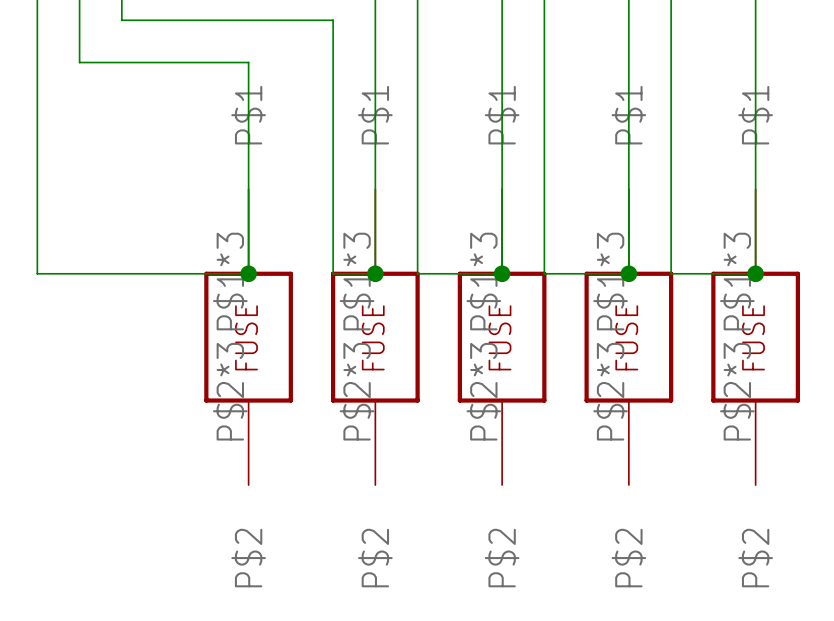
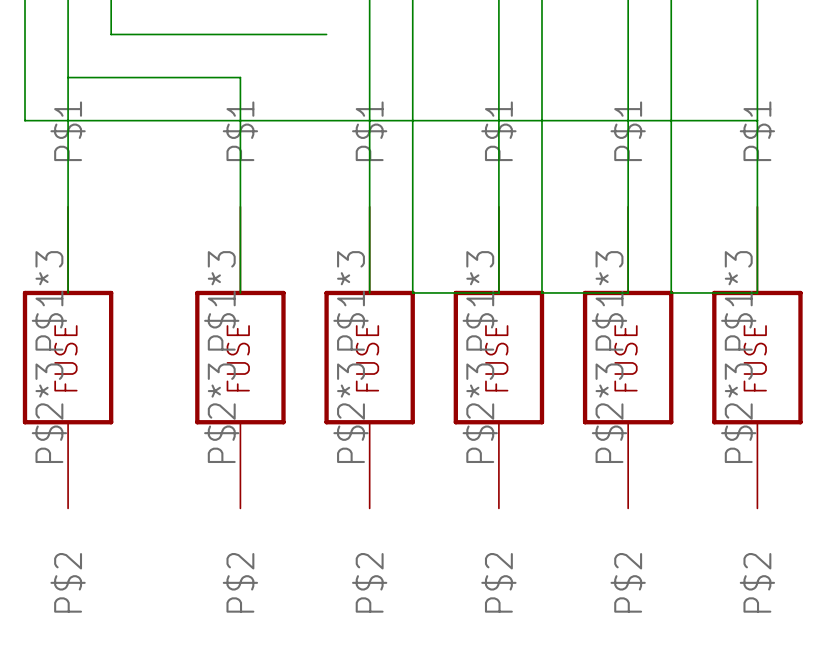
wire: (333, 20) (333, 273) (375, 273) -> none
wire: none -> (68, 77) (68, 292)
wire: (37, 104) (37, 273) (248, 273) -> (25, 120) (757, 120)
junction: (248, 273) -> none
junction: (375, 273) -> none
junction: (502, 273) -> none
junction: (628, 273) -> none
junction: (755, 273) -> none
part: none -> (68, 357)

